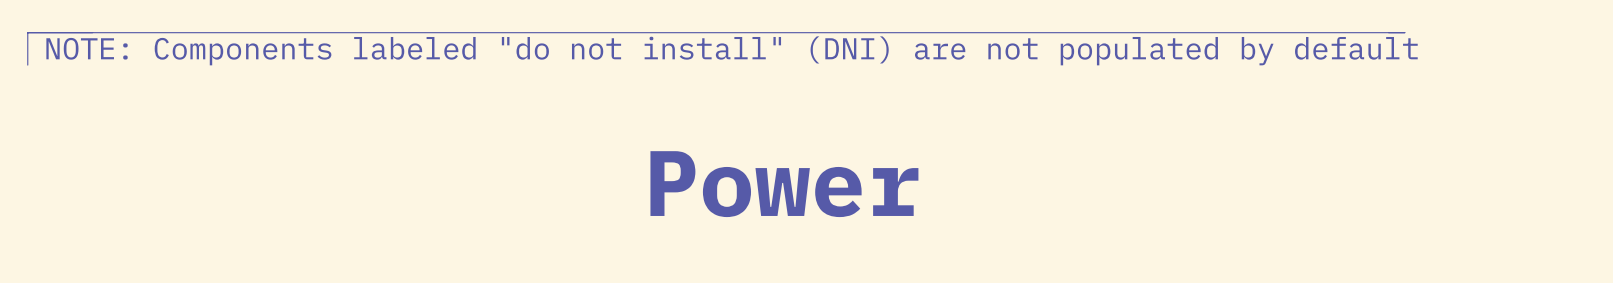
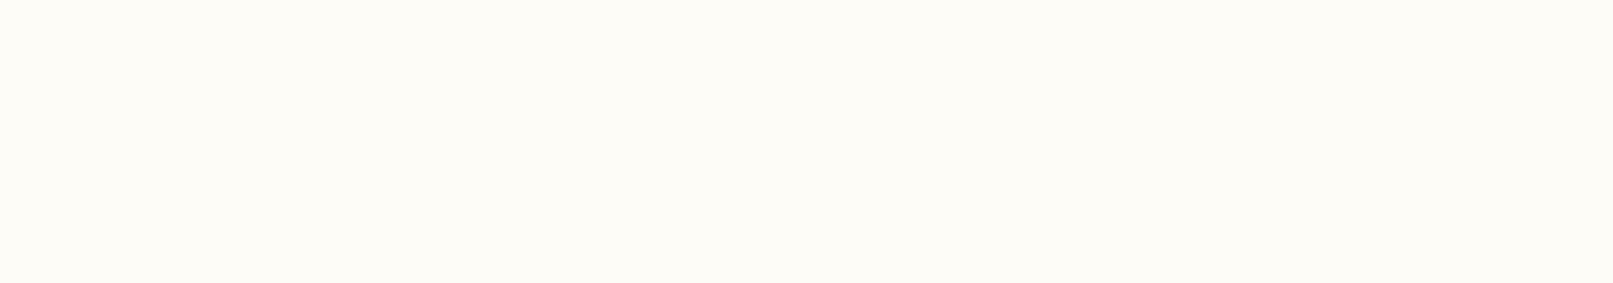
line: (1404, 32) (27, 32) (27, 65) -> none
text: NOTE: Components labeled "do not install" (DNI) are not populated by default (732, 50) -> none
text: Power (784, 184) -> none

